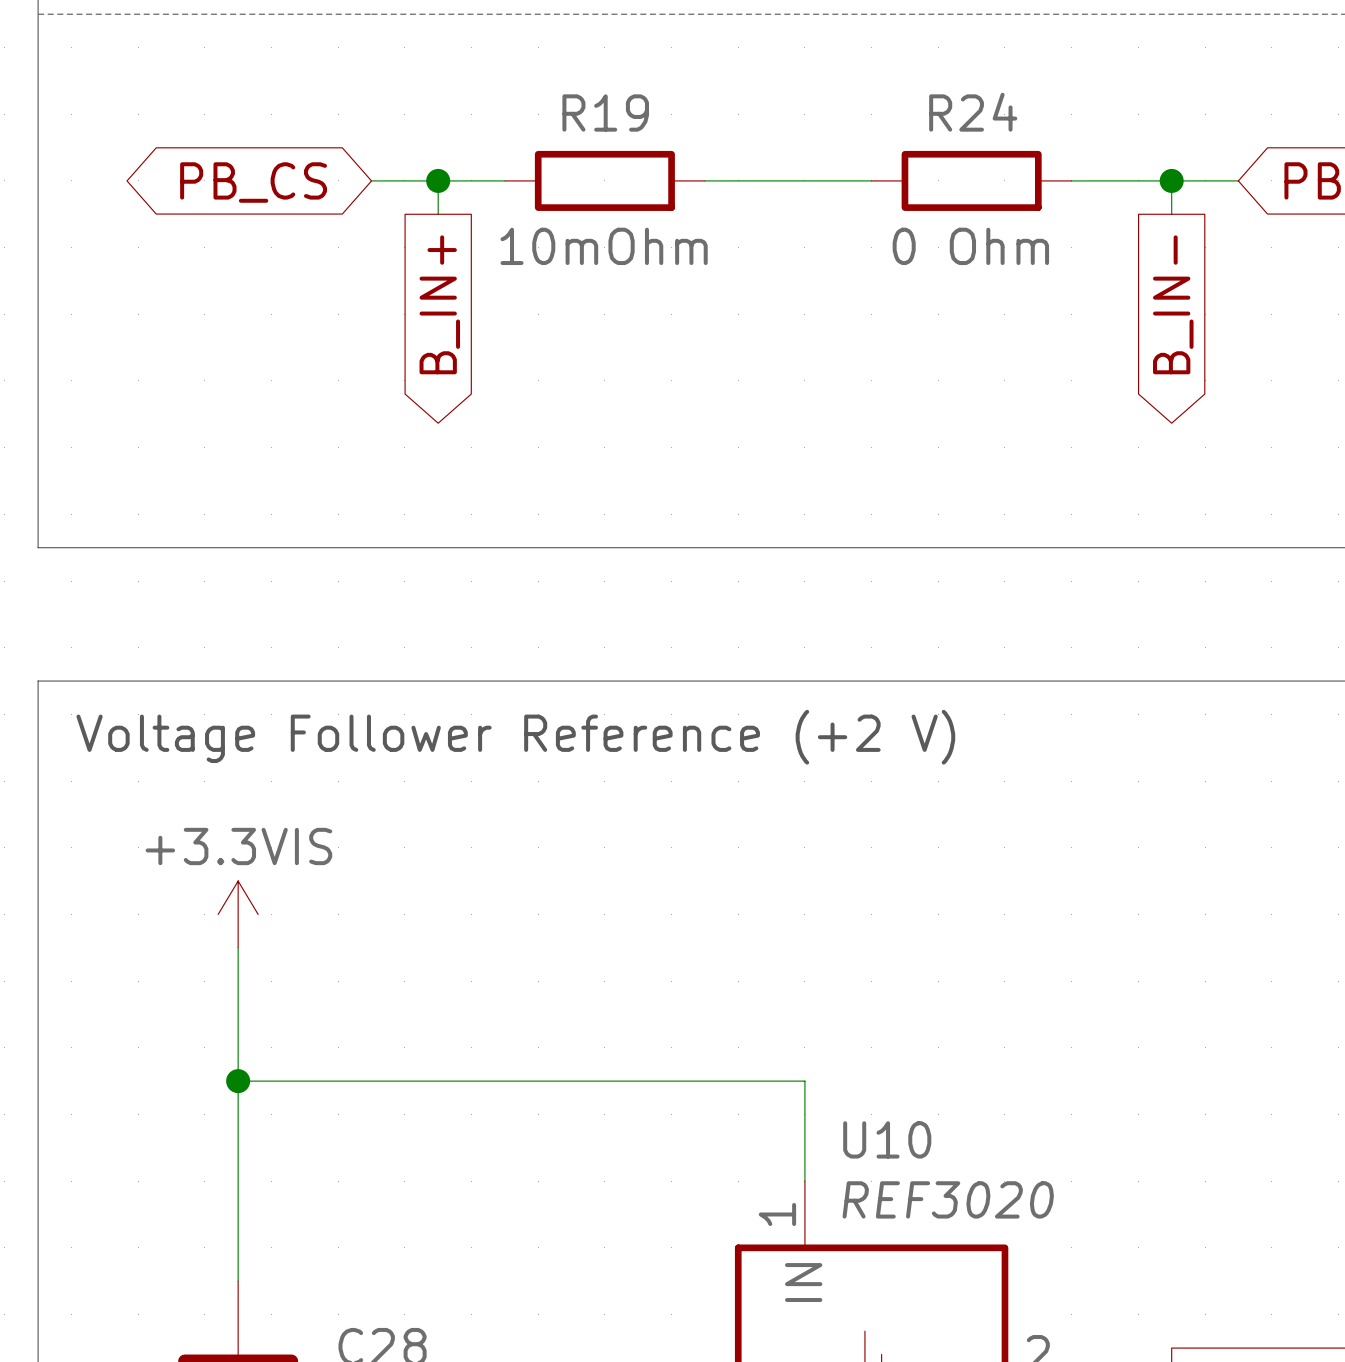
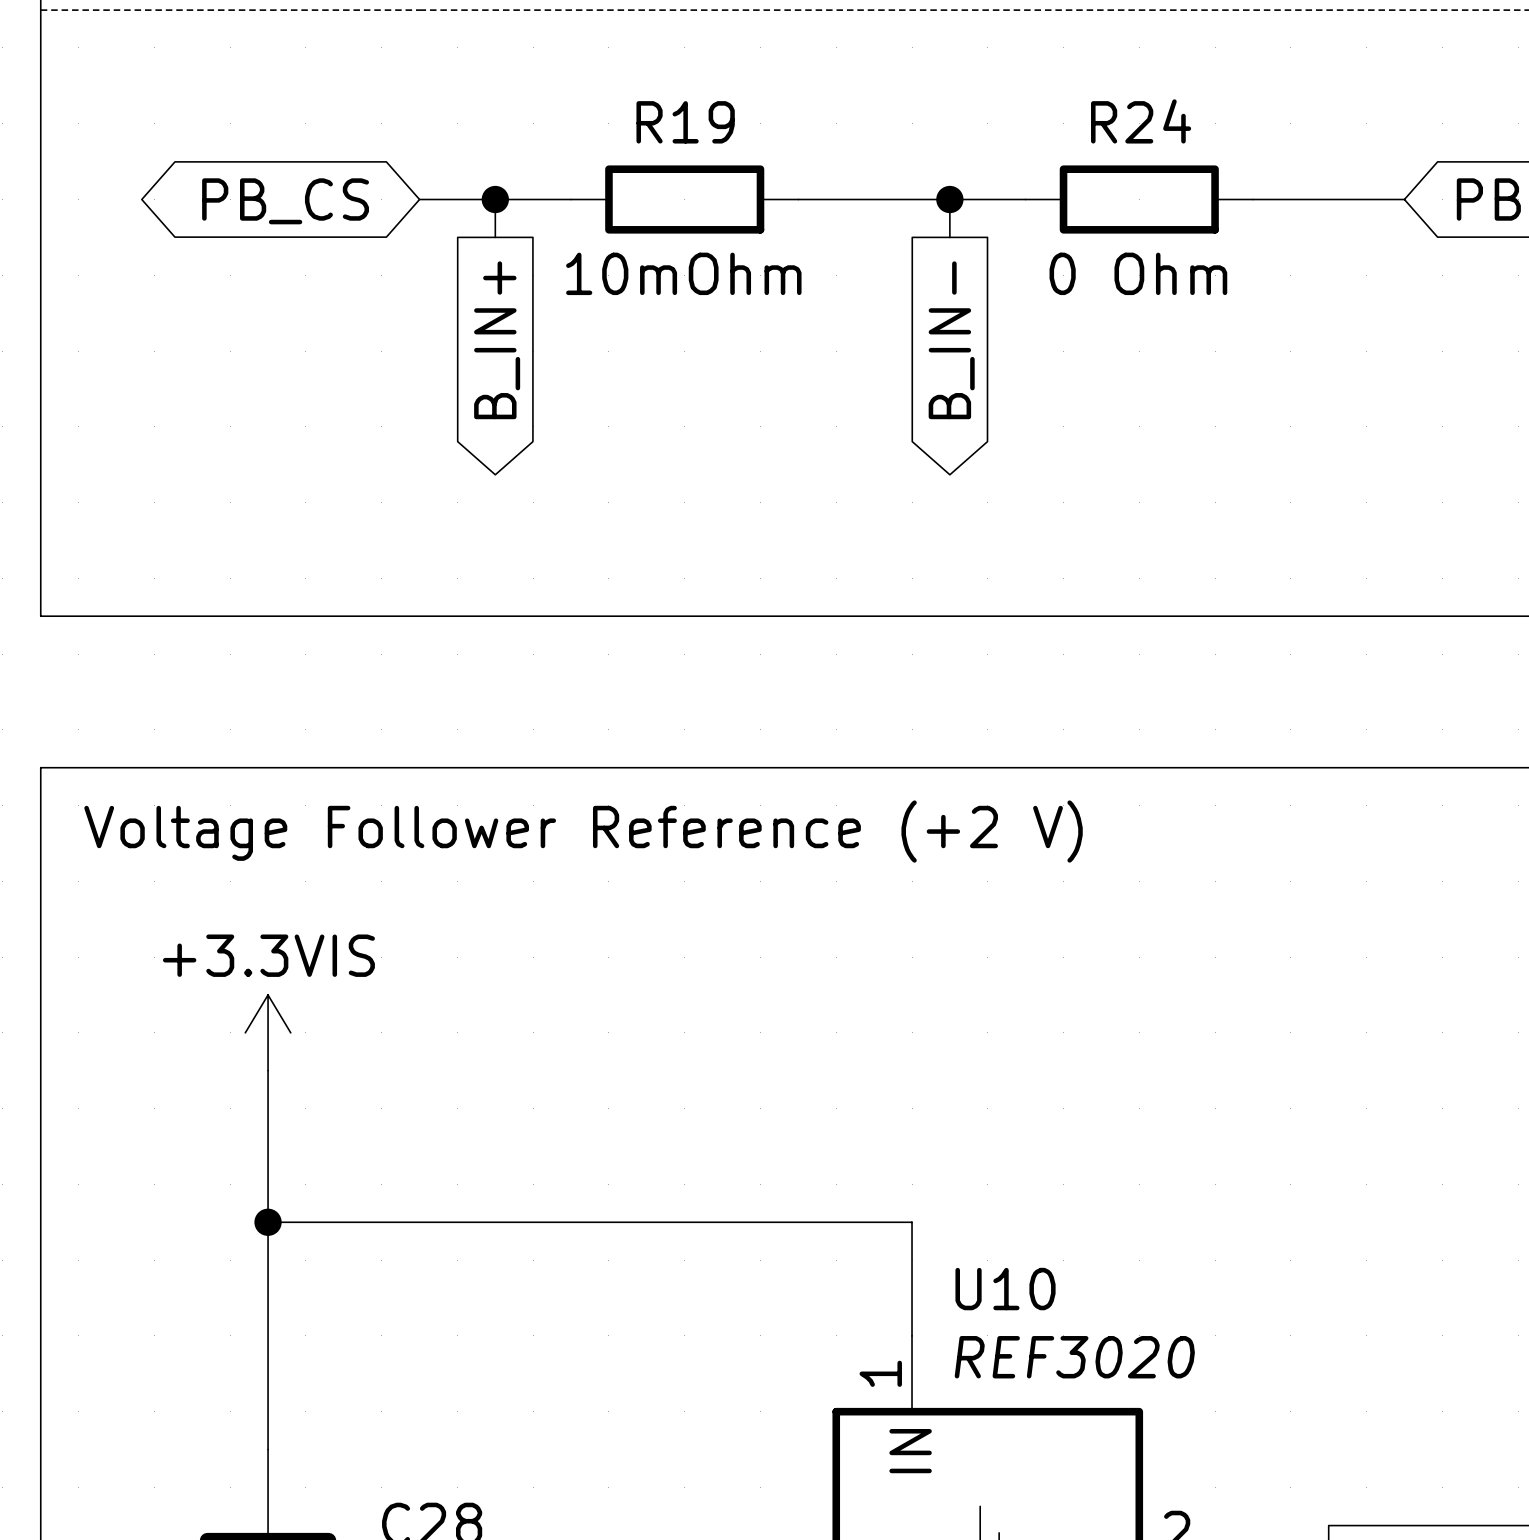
junction: none -> (949, 199)
R24 position: (971, 180) -> (1139, 199)
wire: (1171, 180) (1171, 214) -> (949, 199) (949, 237)
junction: (1171, 180) -> none
global label position: B_IN- (1173, 304) -> B_IN- (951, 340)

